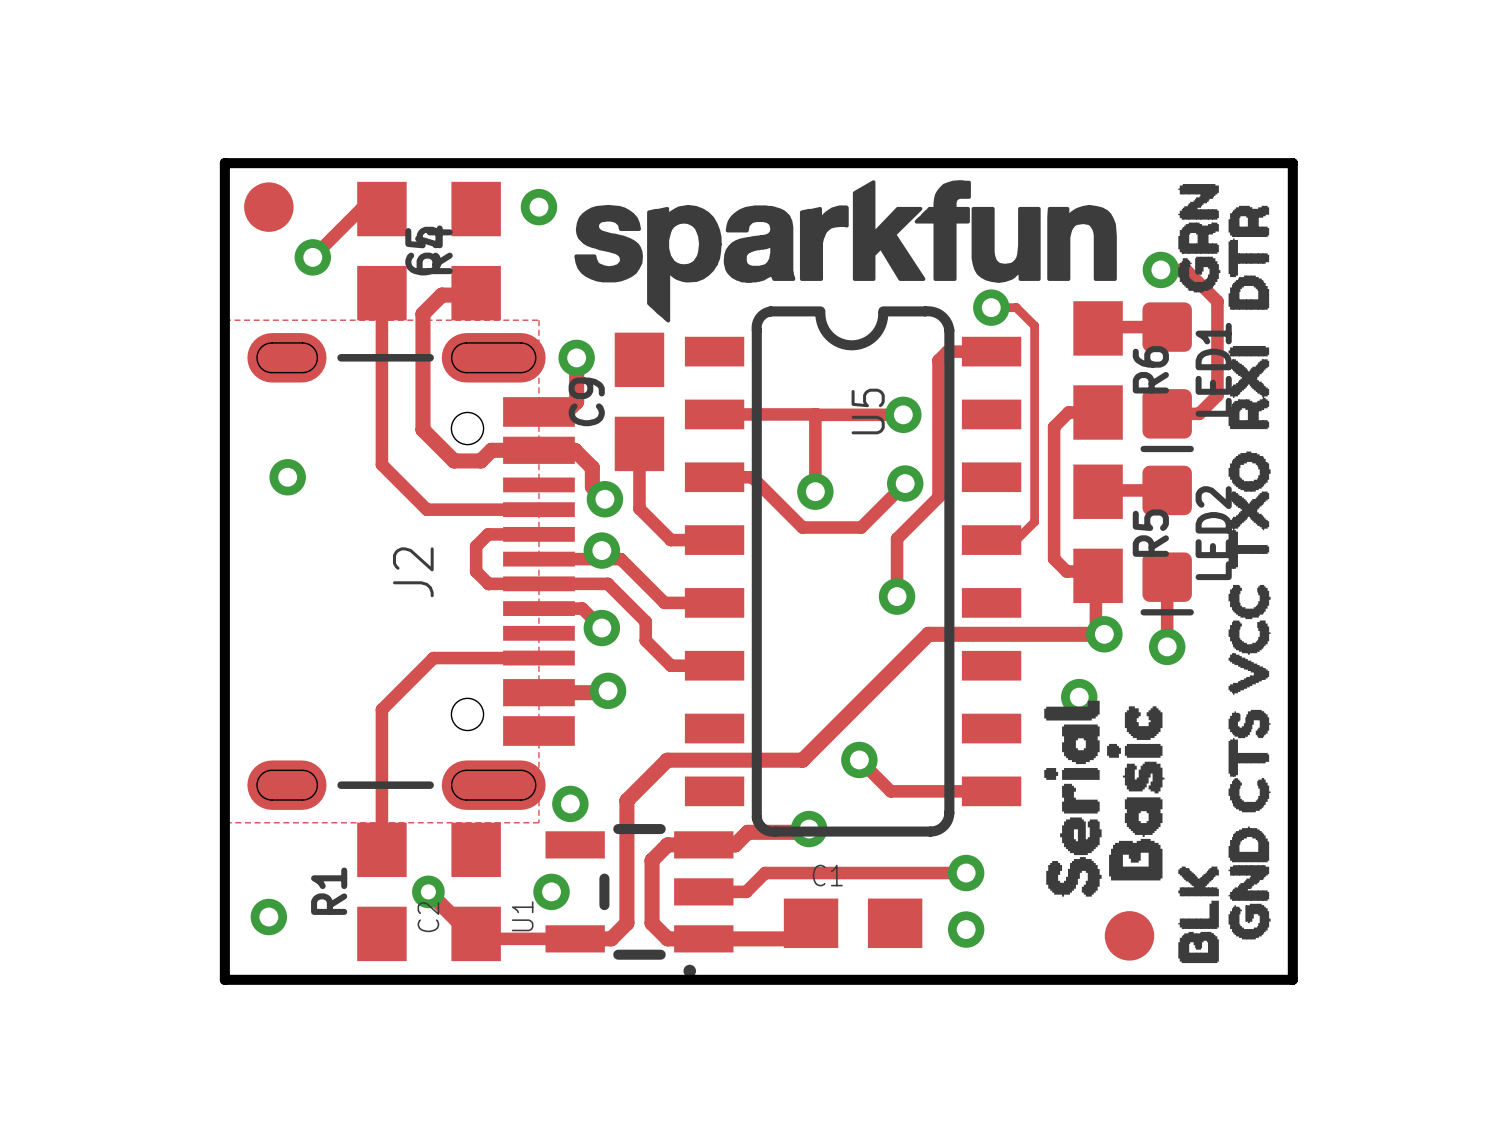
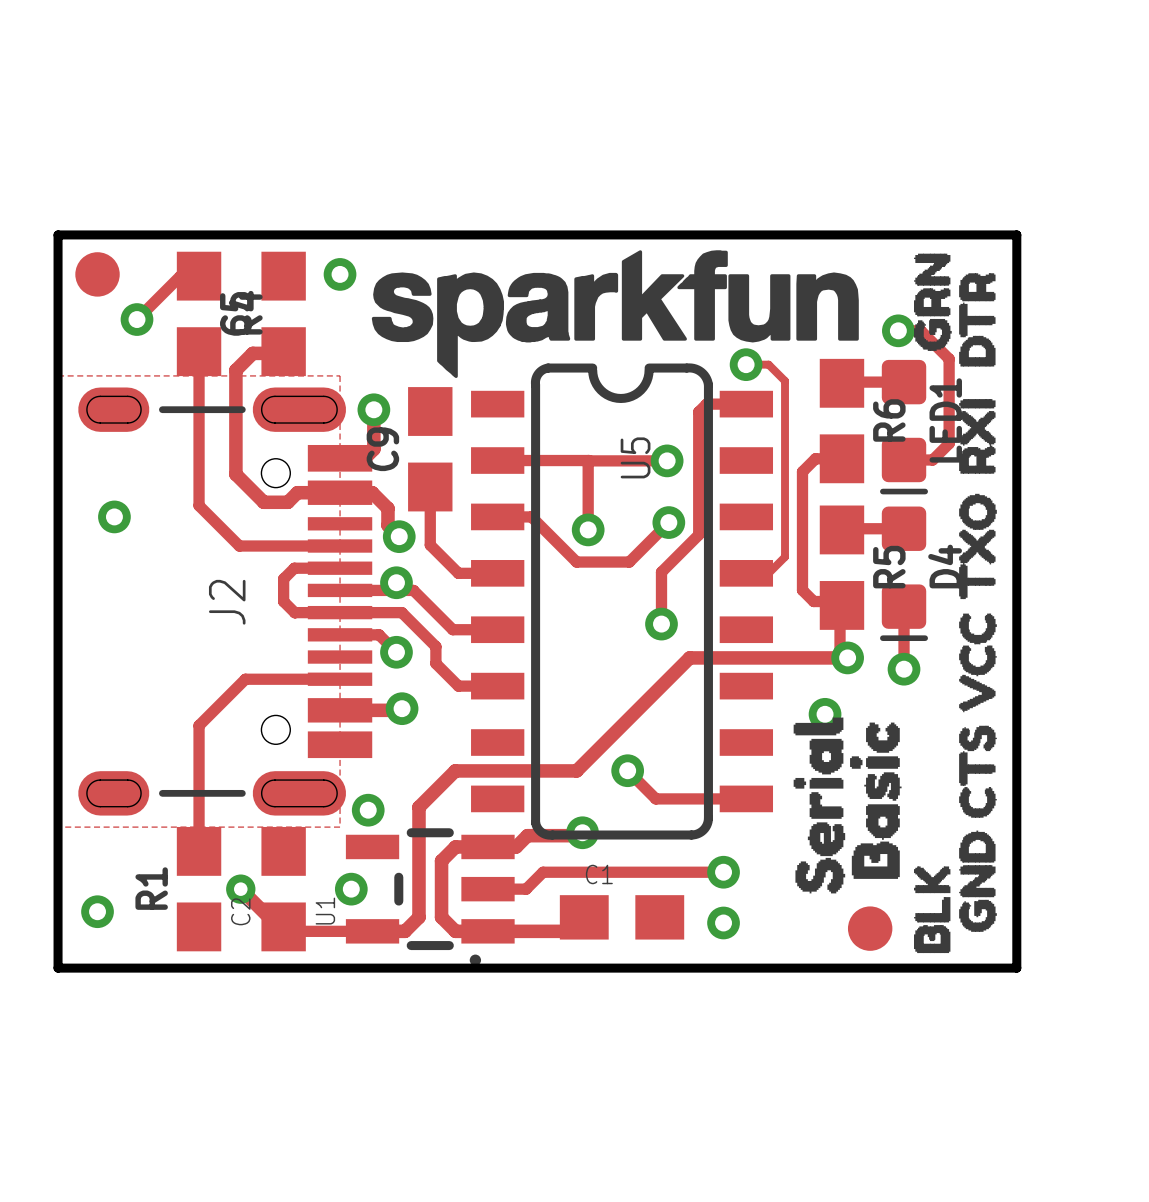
LED2 name: LED2 (1213, 533) -> D4 (945, 566)

